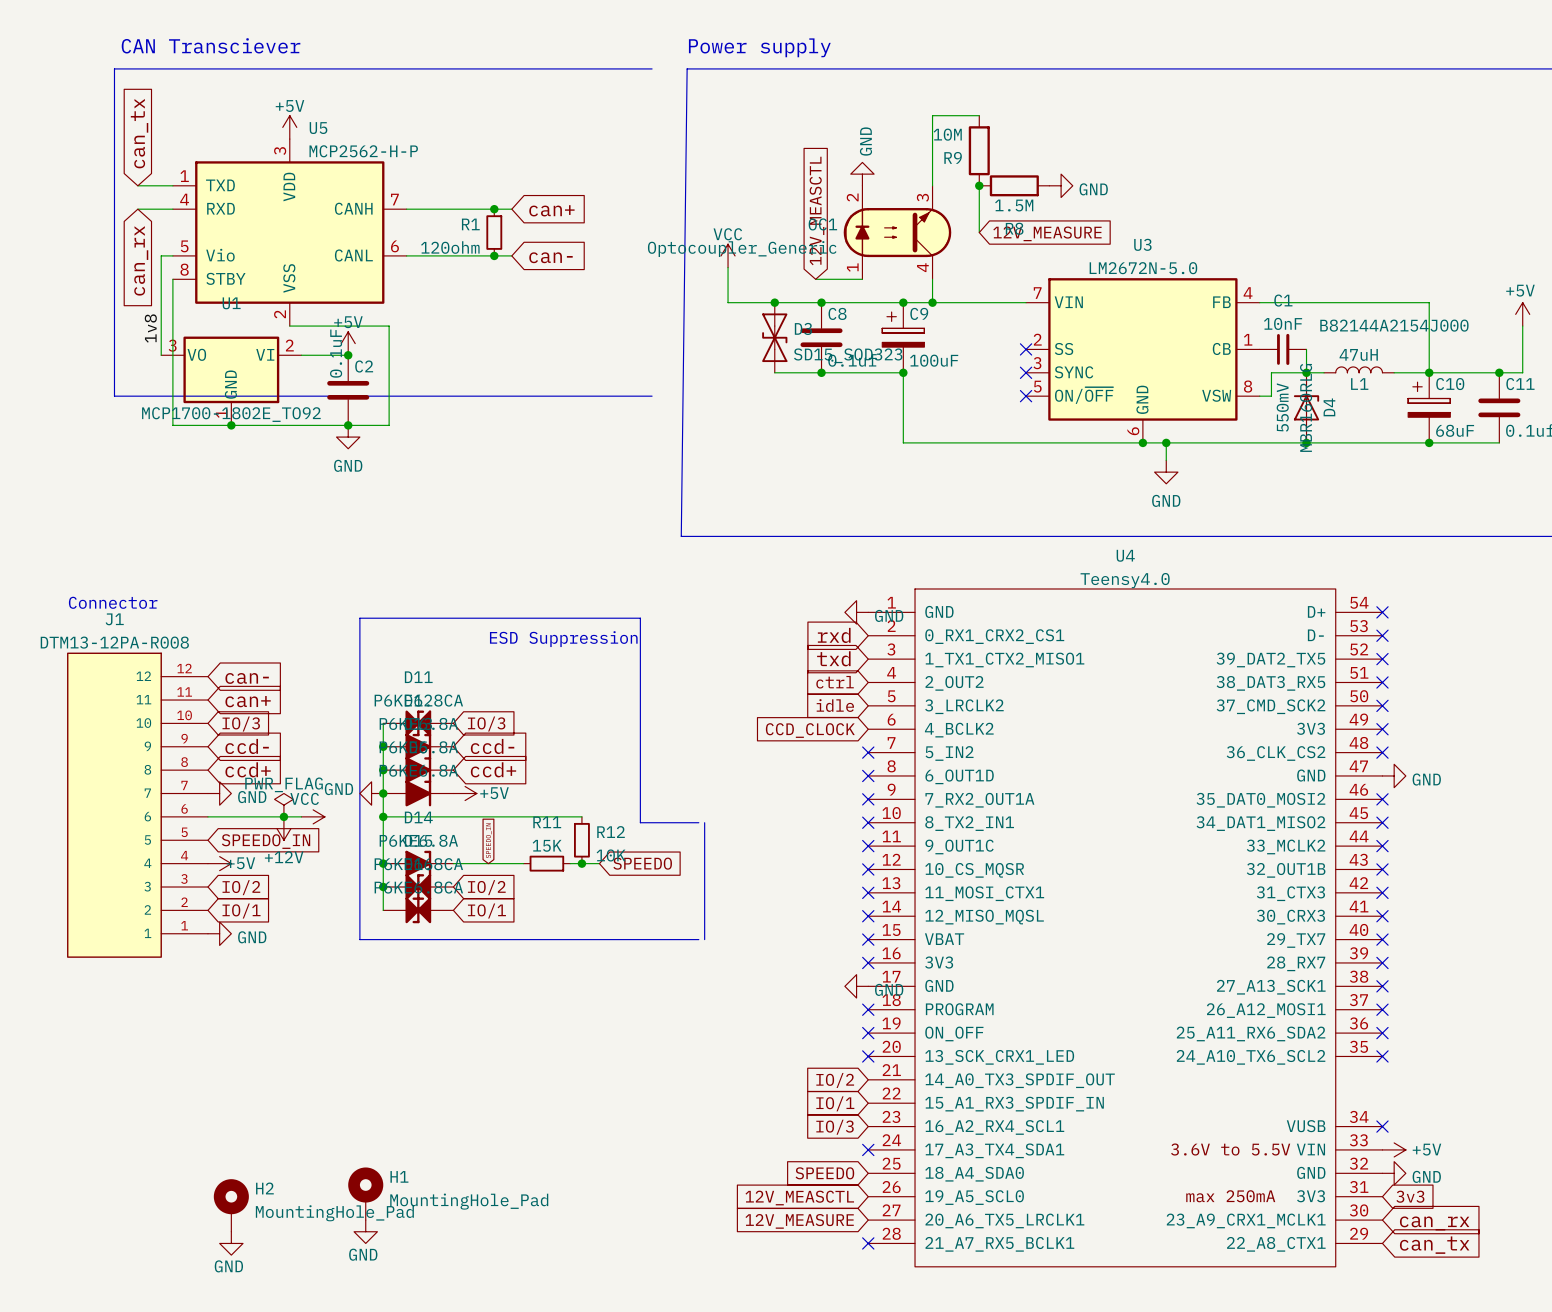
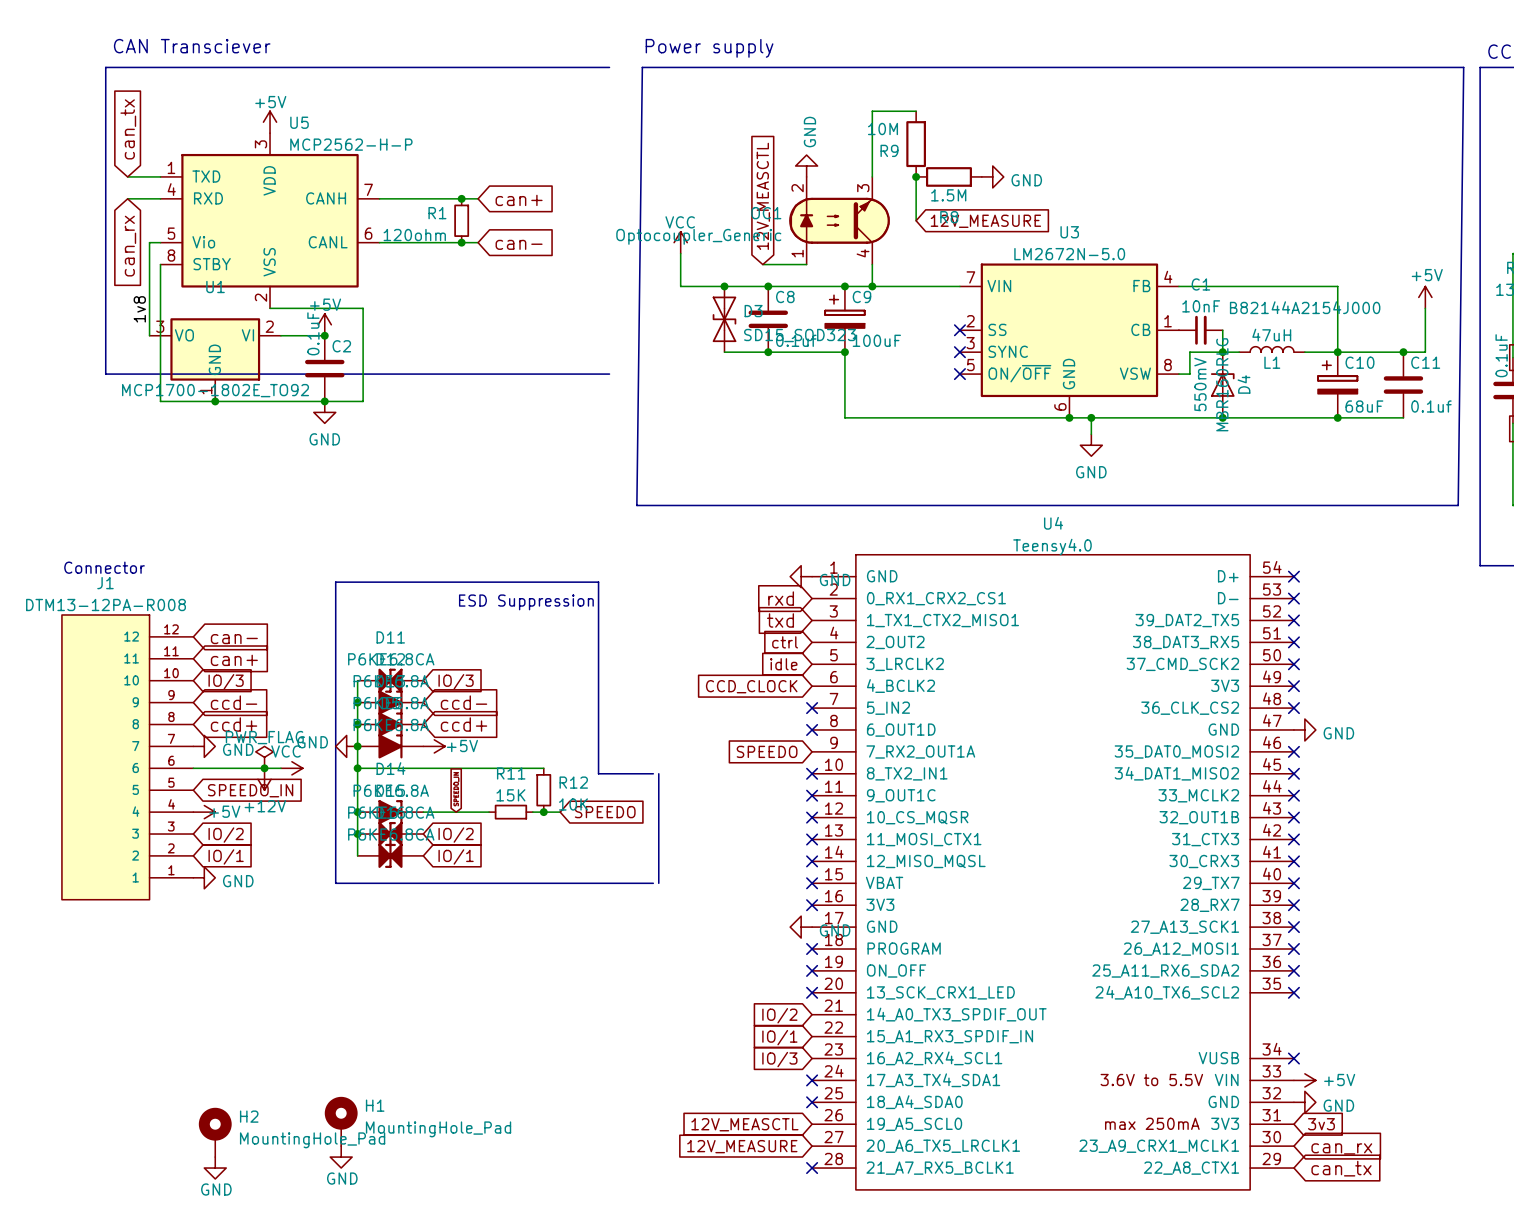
global label: none -> SPEEDO (767, 751)
no-connect mark: (868, 799) -> none
global label: SPEEDO (824, 1173) -> none
no-connect mark: none -> (812, 1102)

